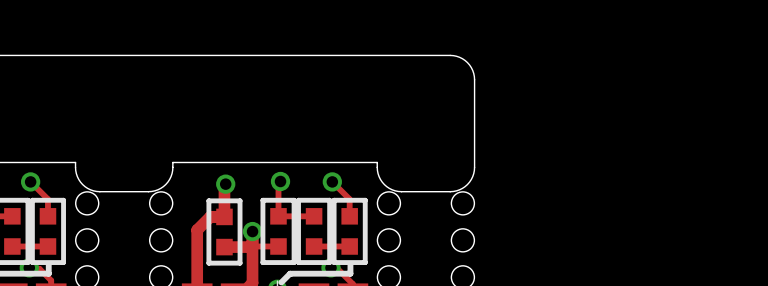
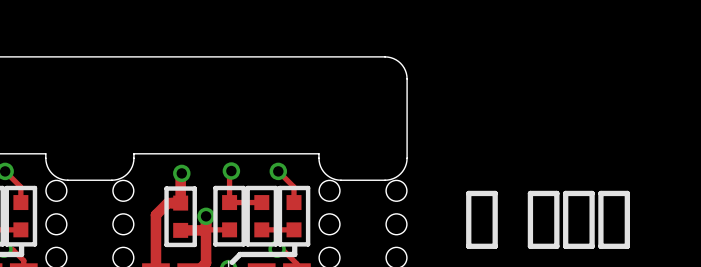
line: none -> (468, 193) (468, 246) (495, 246) (495, 193) (468, 193)
line: none -> (530, 193) (556, 193) (556, 246) (530, 246) (530, 193)
line: none -> (565, 193) (592, 193) (592, 246) (565, 246) (565, 193)
line: none -> (600, 193) (627, 193) (627, 246) (600, 246) (600, 193)

